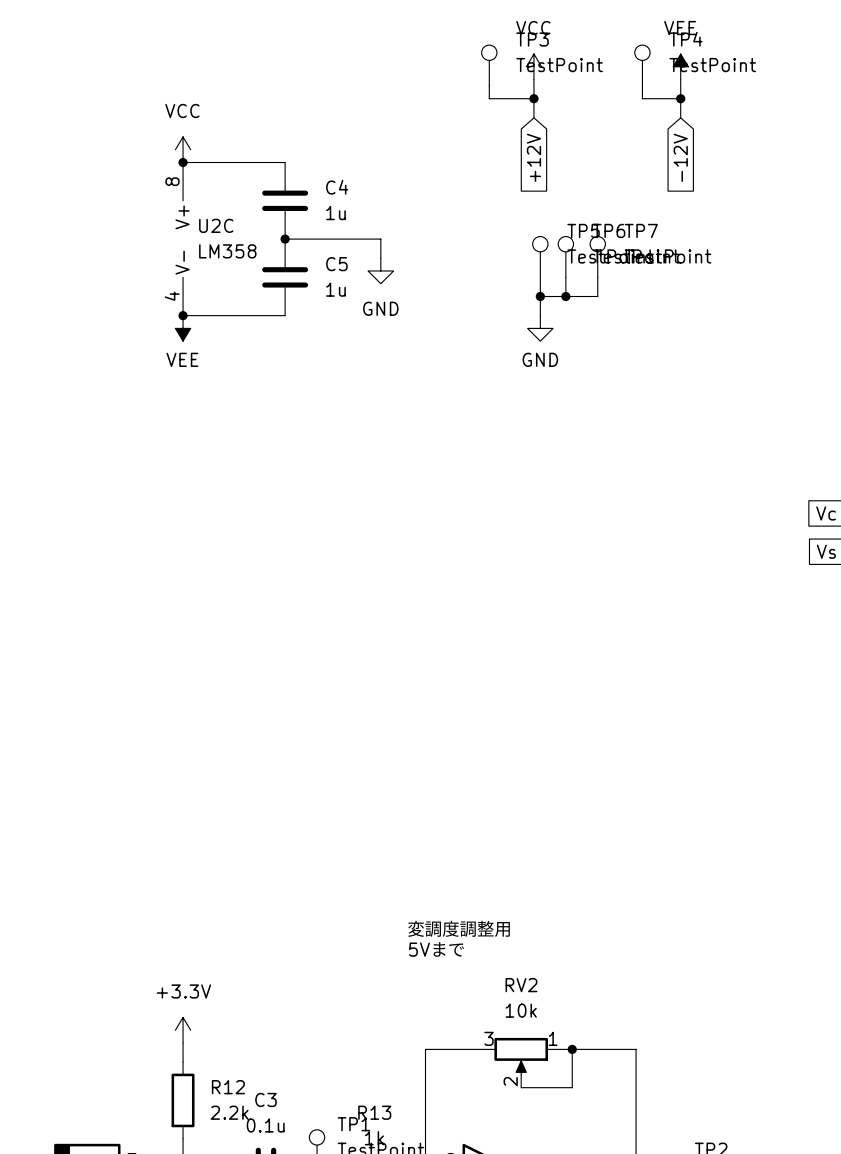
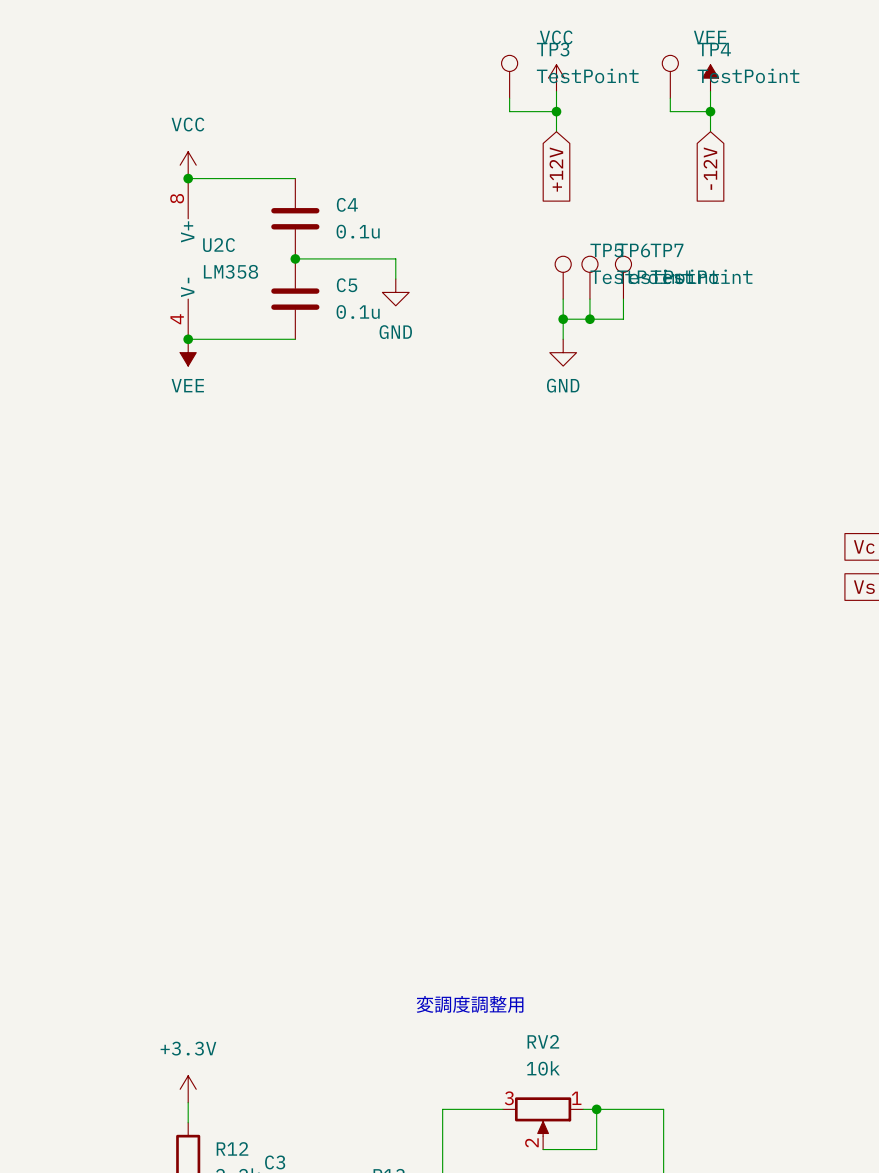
C4 value: 1u (335, 213) -> 0.1u (358, 231)
C5 value: 1u (335, 289) -> 0.1u (358, 312)
text: 変調度調整用 (459, 928) -> none
text: 5Vまで (436, 949) -> 変調度調整用 (470, 1004)

